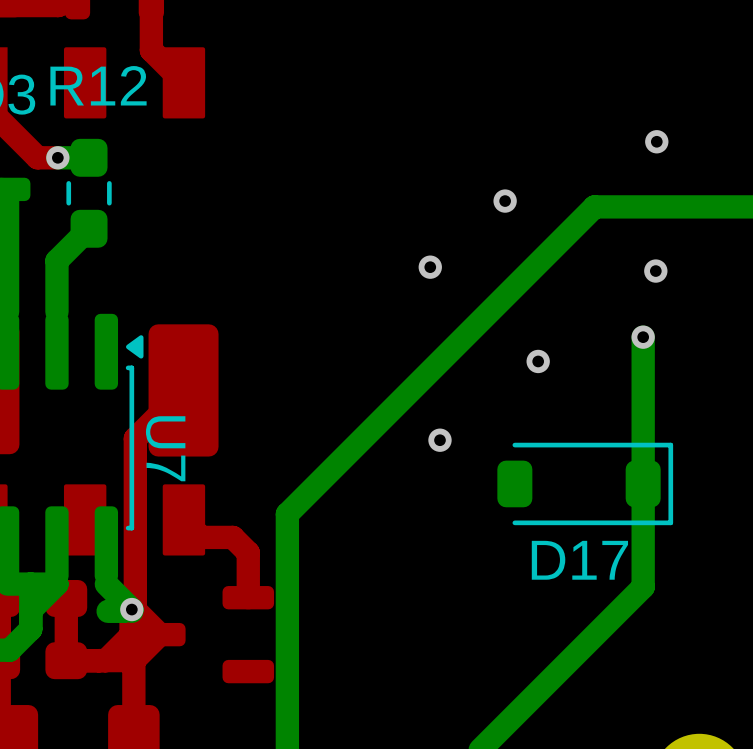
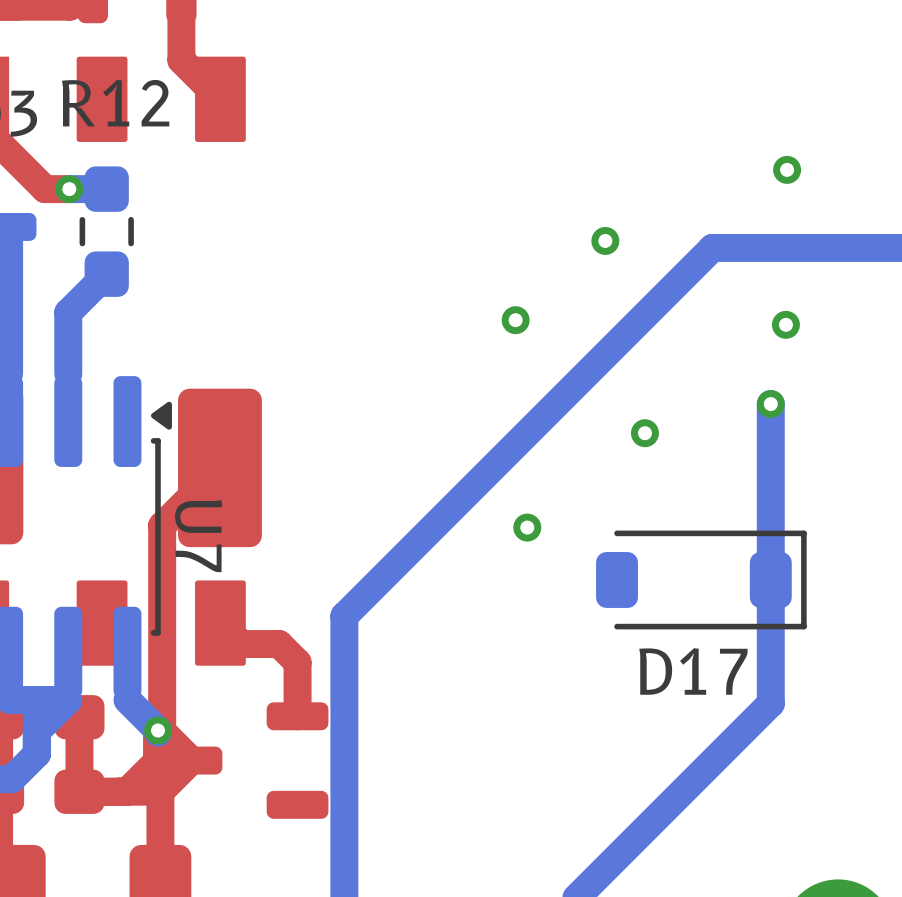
bottom track: (131, 609) (108, 611) -> none

